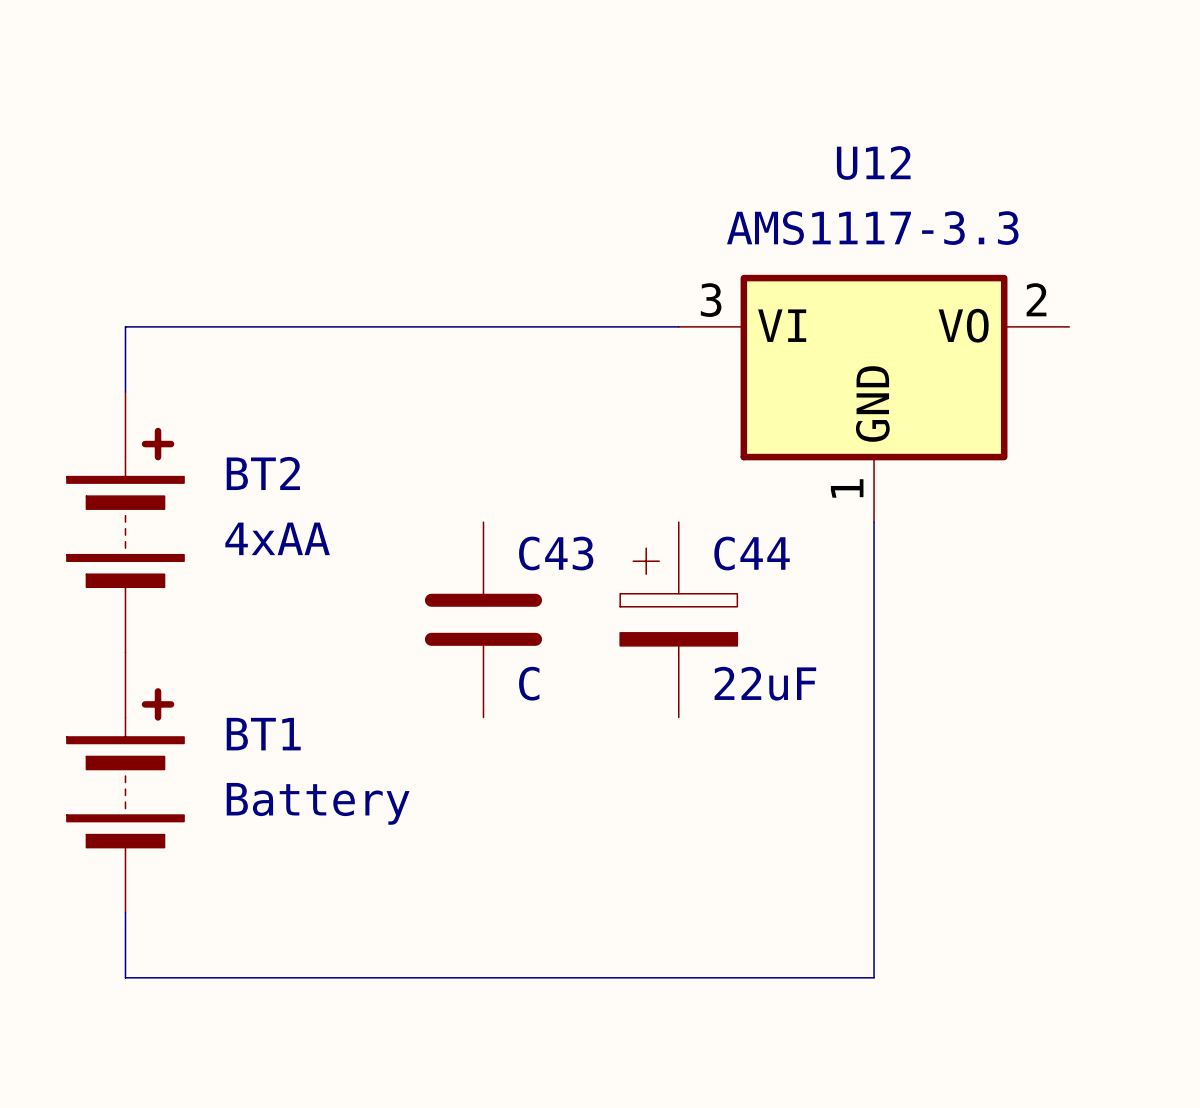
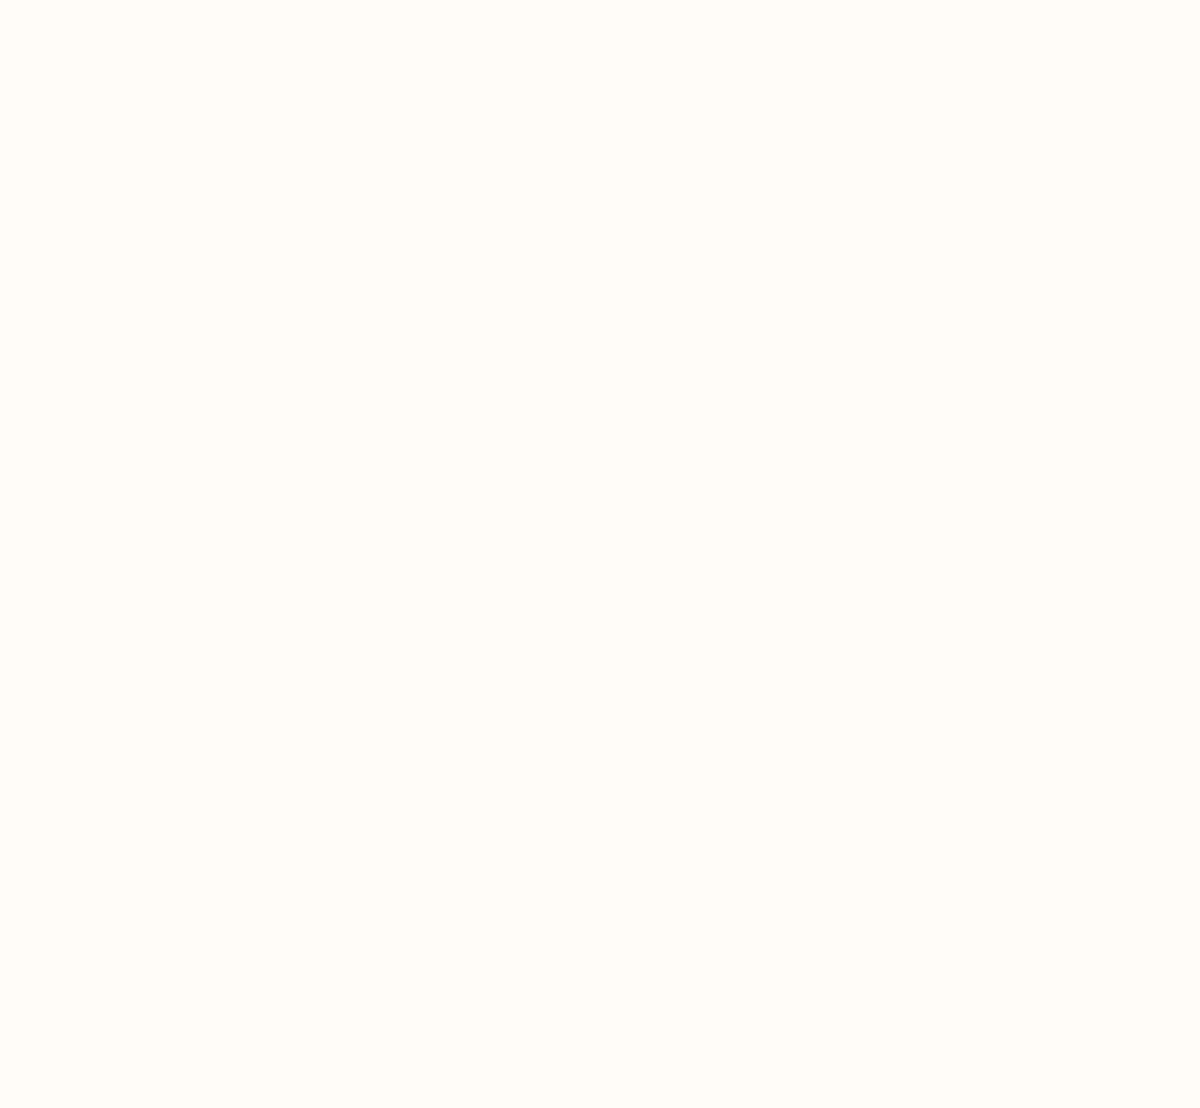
wire: (678, 326) (125, 326) (125, 391) -> none
U12: AMS1117-3.3 (874, 398) -> none
BT2: 4xAA (125, 522) -> none
wire: (874, 522) (874, 977) (125, 977) (125, 912) -> none
C43: C (483, 619) -> none
C44: 22uF (678, 619) -> none
BT1: Battery (125, 782) -> none

